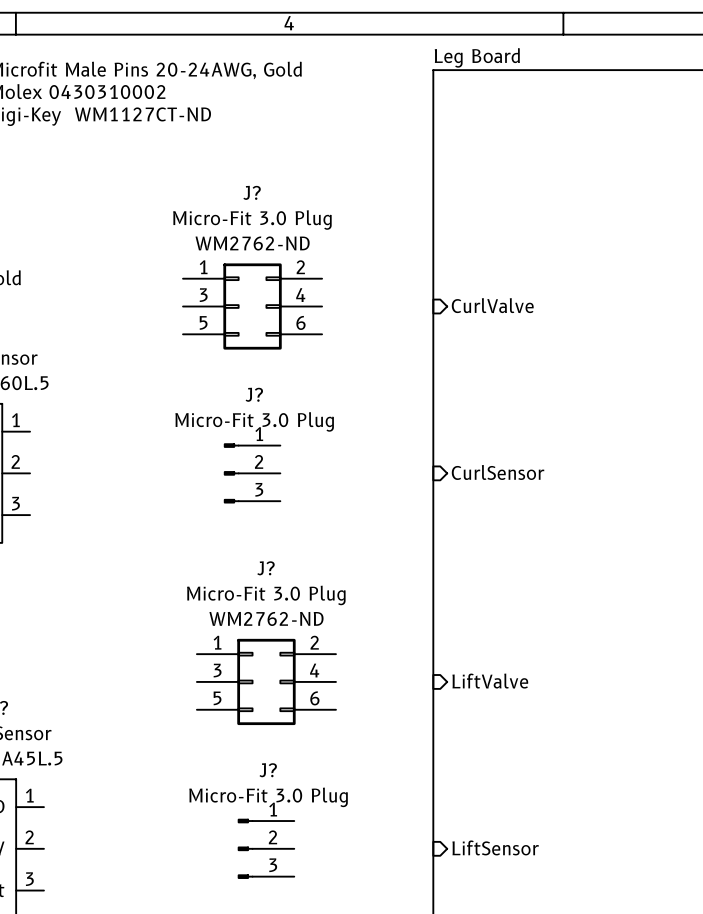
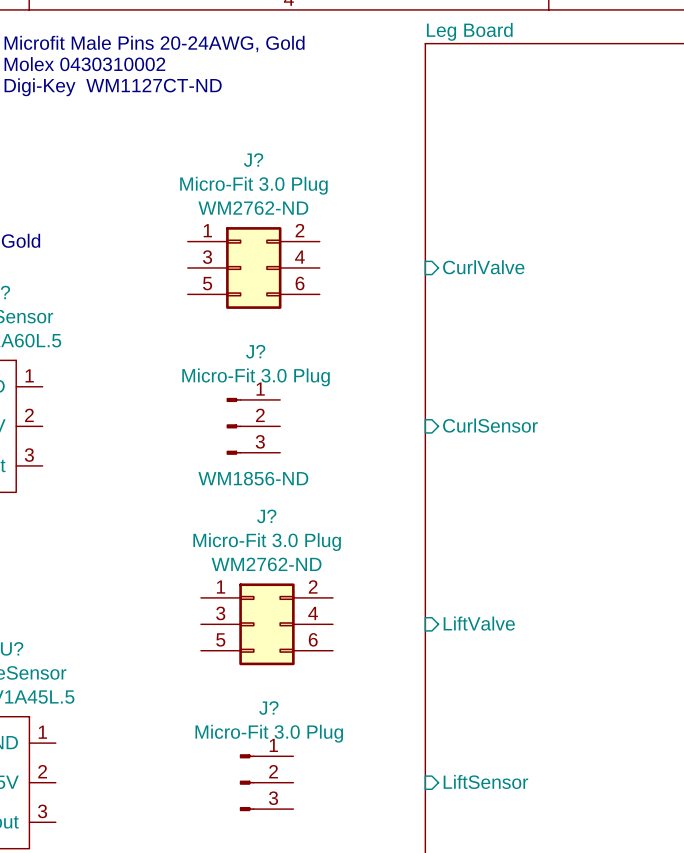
J? text: none -> WM1856-ND (253, 478)

